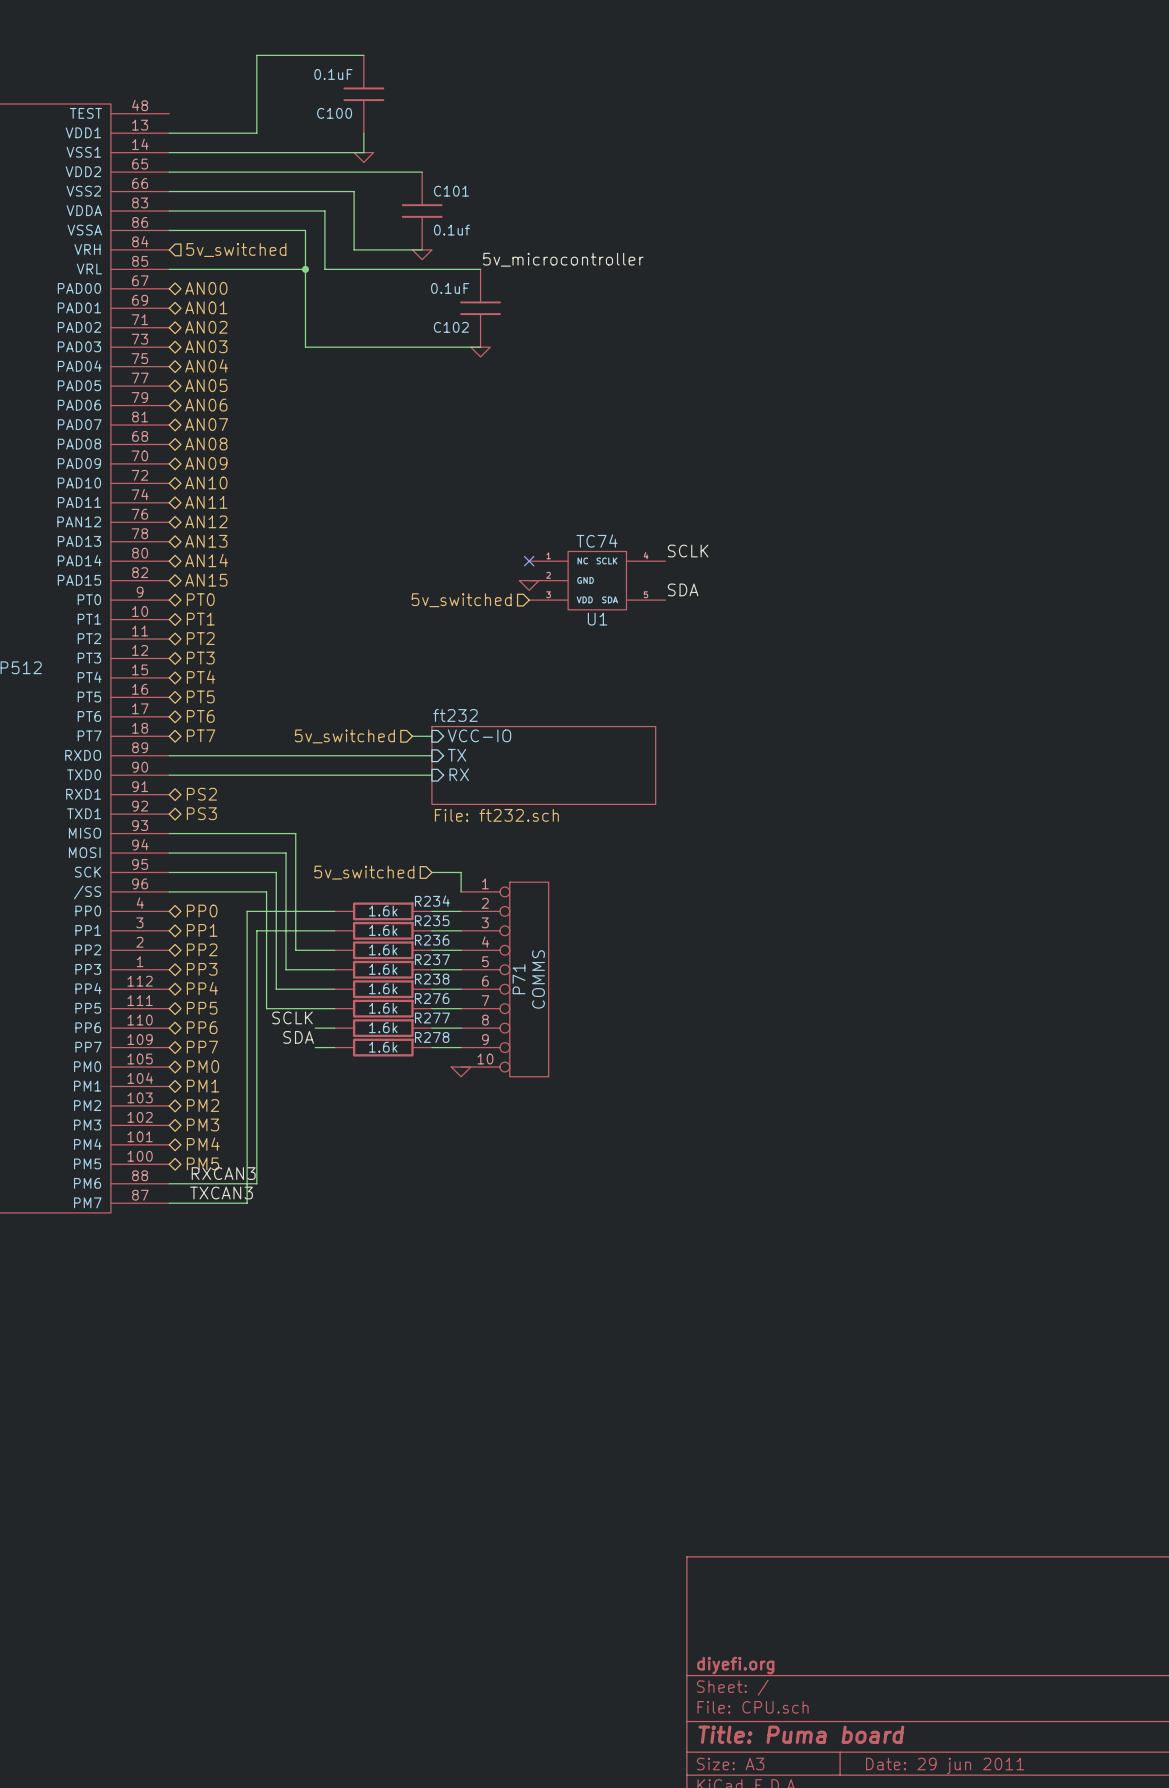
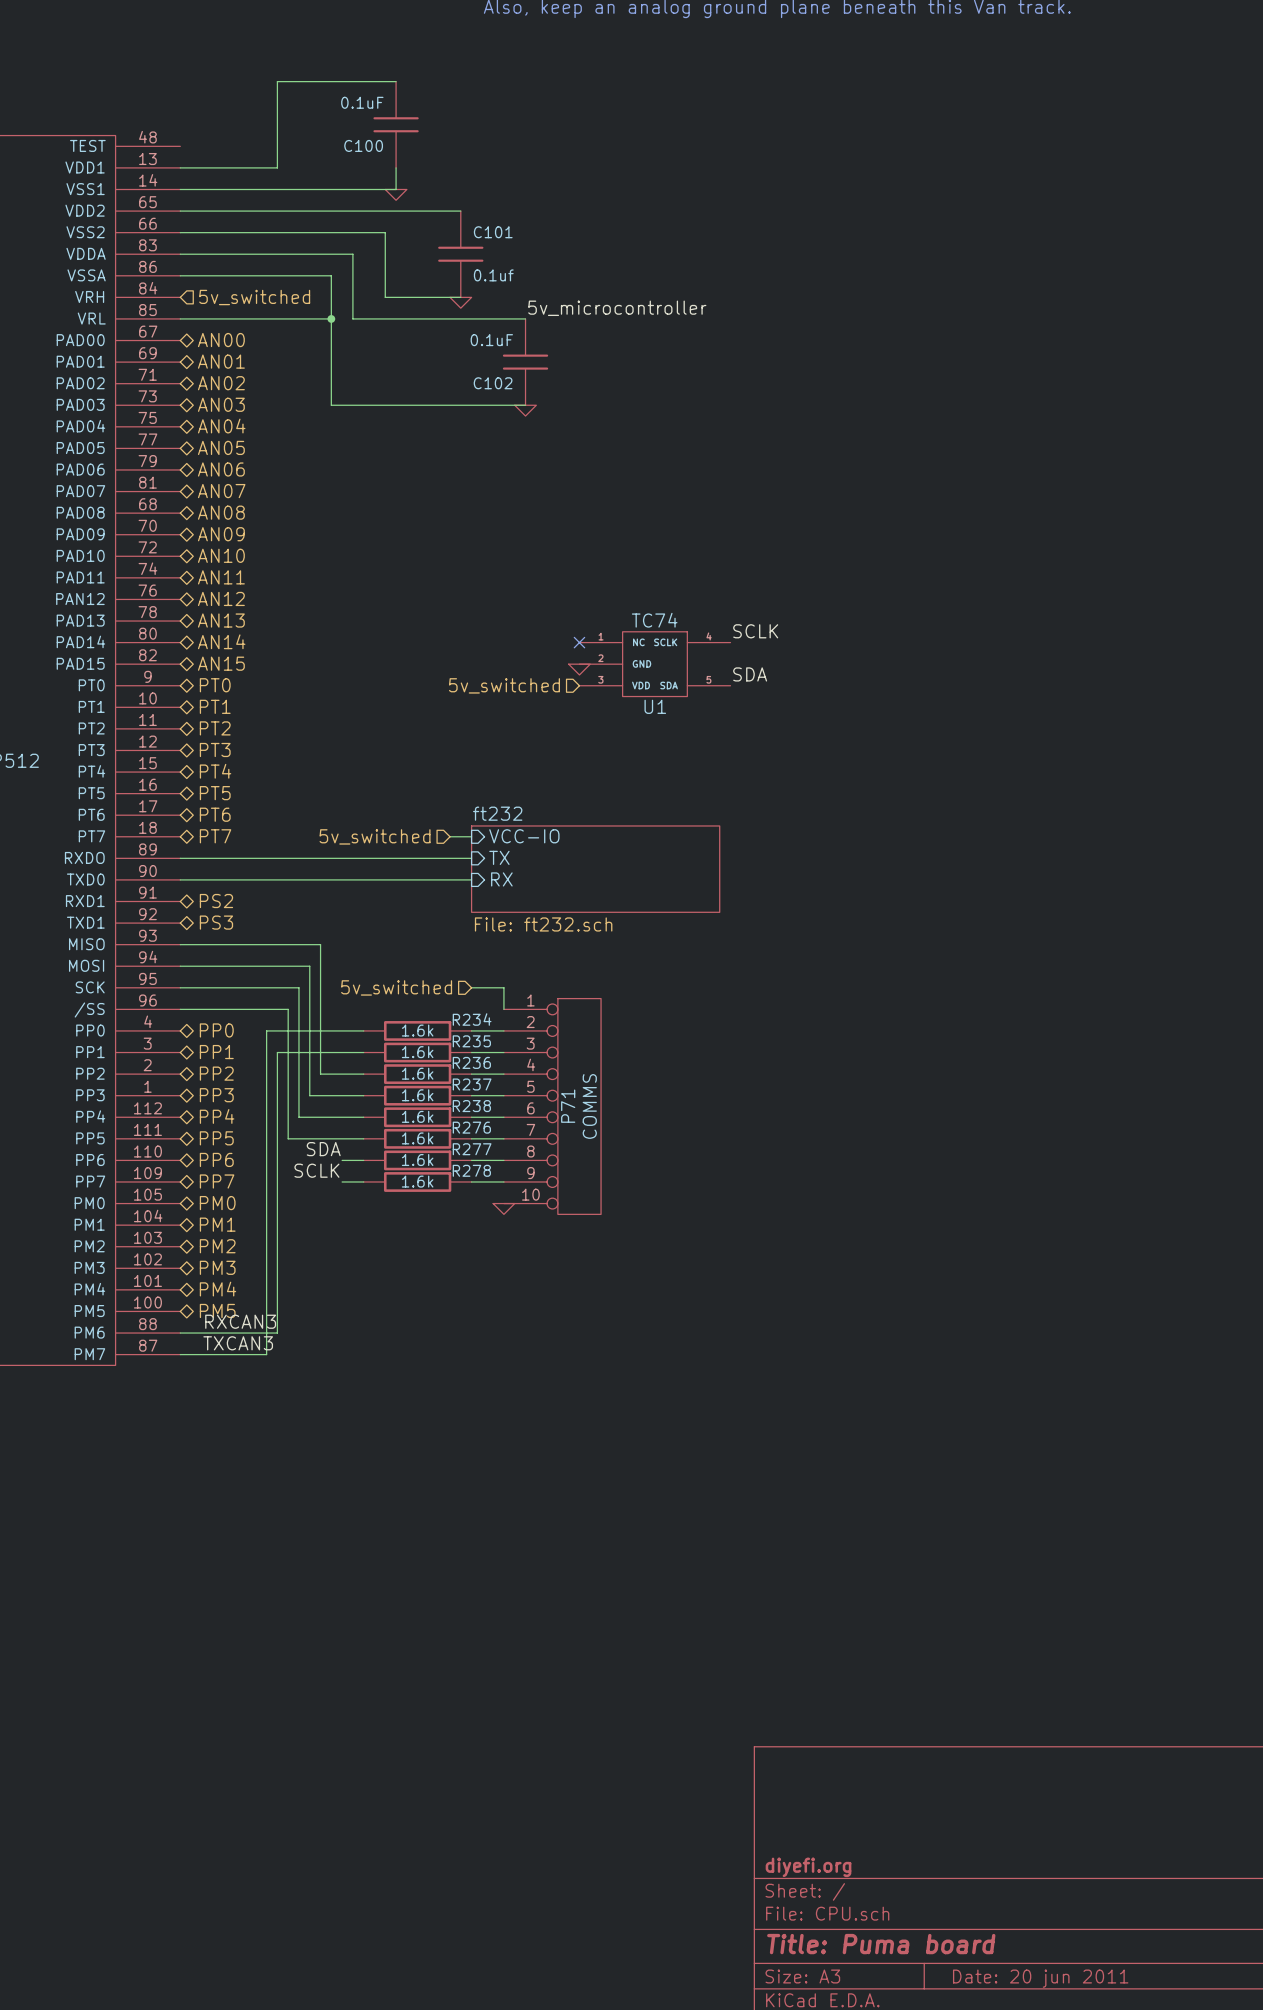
label: SCLK (292, 1017) -> SDA (323, 1149)
label: SDA (298, 1037) -> SCLK (316, 1170)
title block: Date: 29 jun 2011 (945, 1765) -> Date: 20 jun 2011 (1040, 1978)

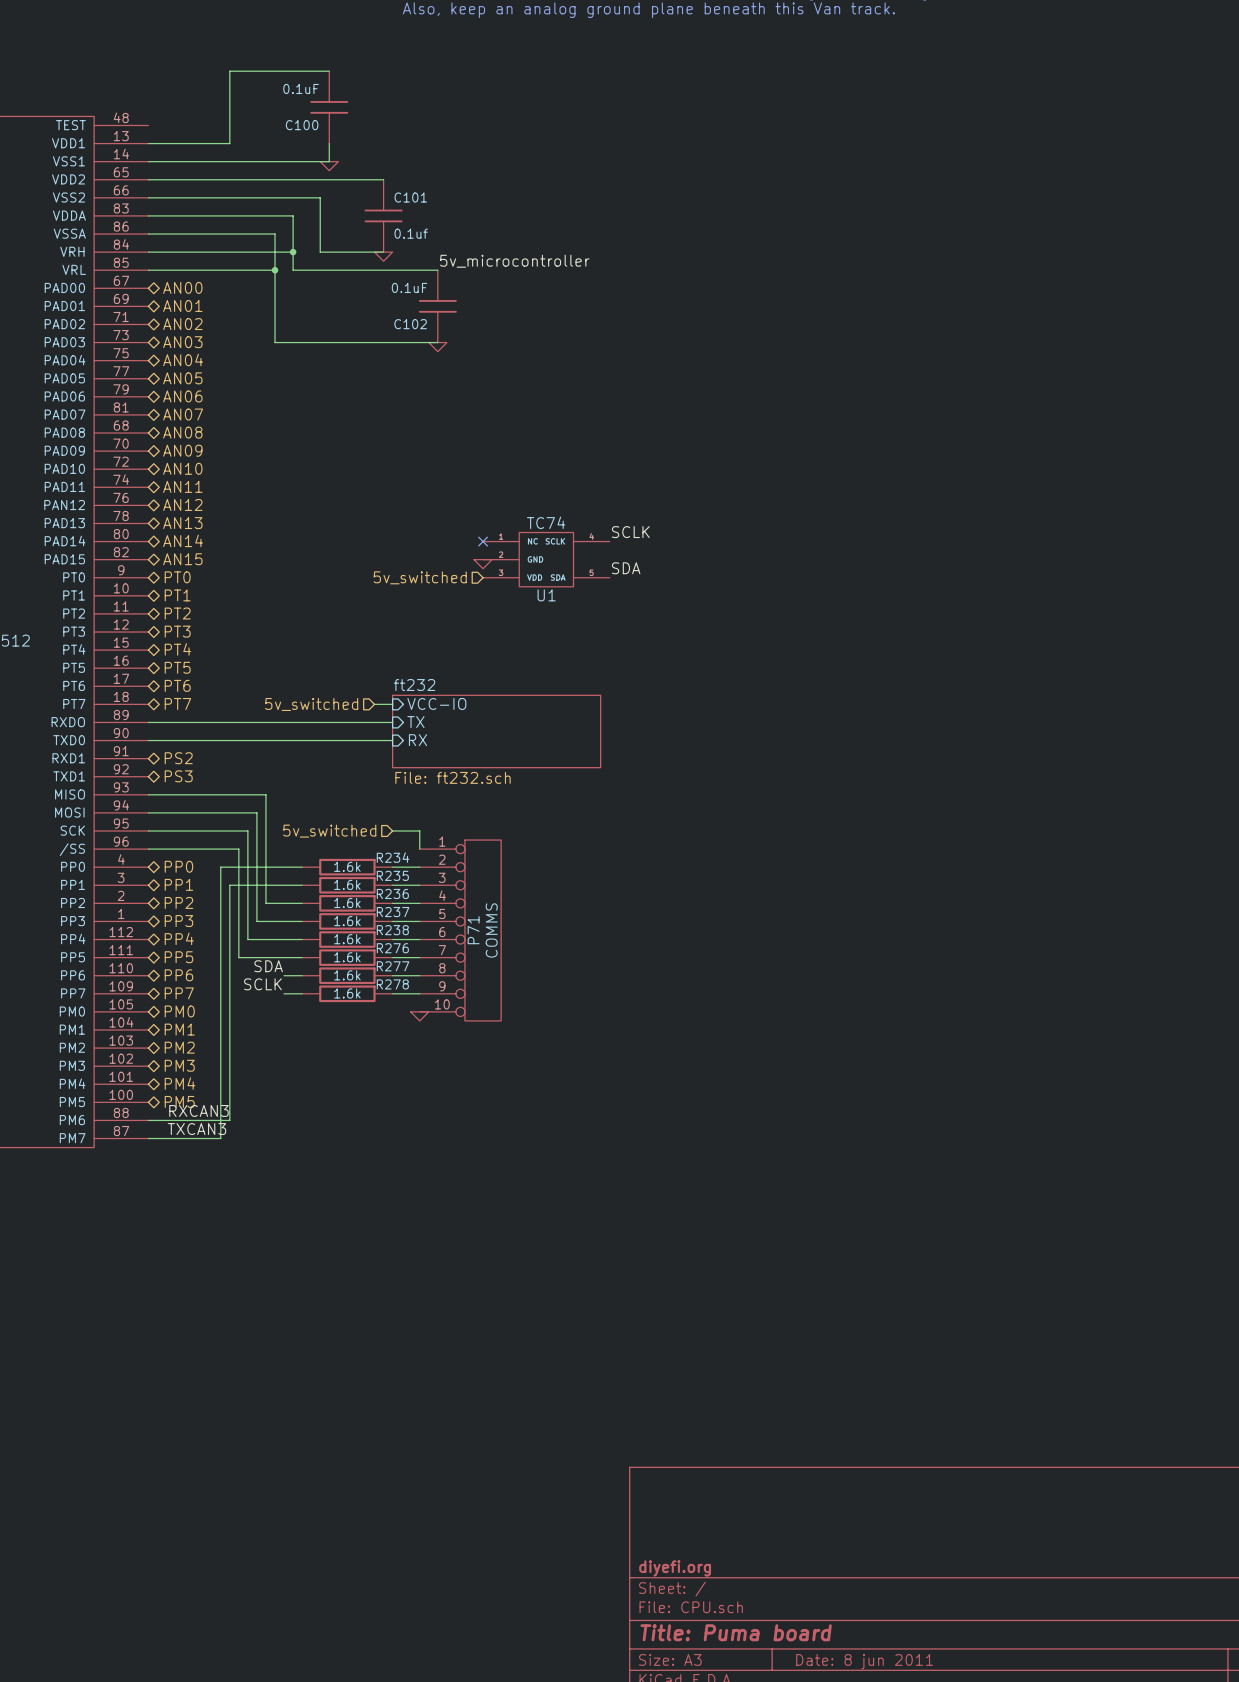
wire: none -> (148, 252) (293, 252)
hierarchical label: 5v_switched (254, 297) -> none
junction: none -> (293, 252)
title block: Date: 20 jun 2011 (1040, 1978) -> Date: 8 jun 2011 (864, 1661)

